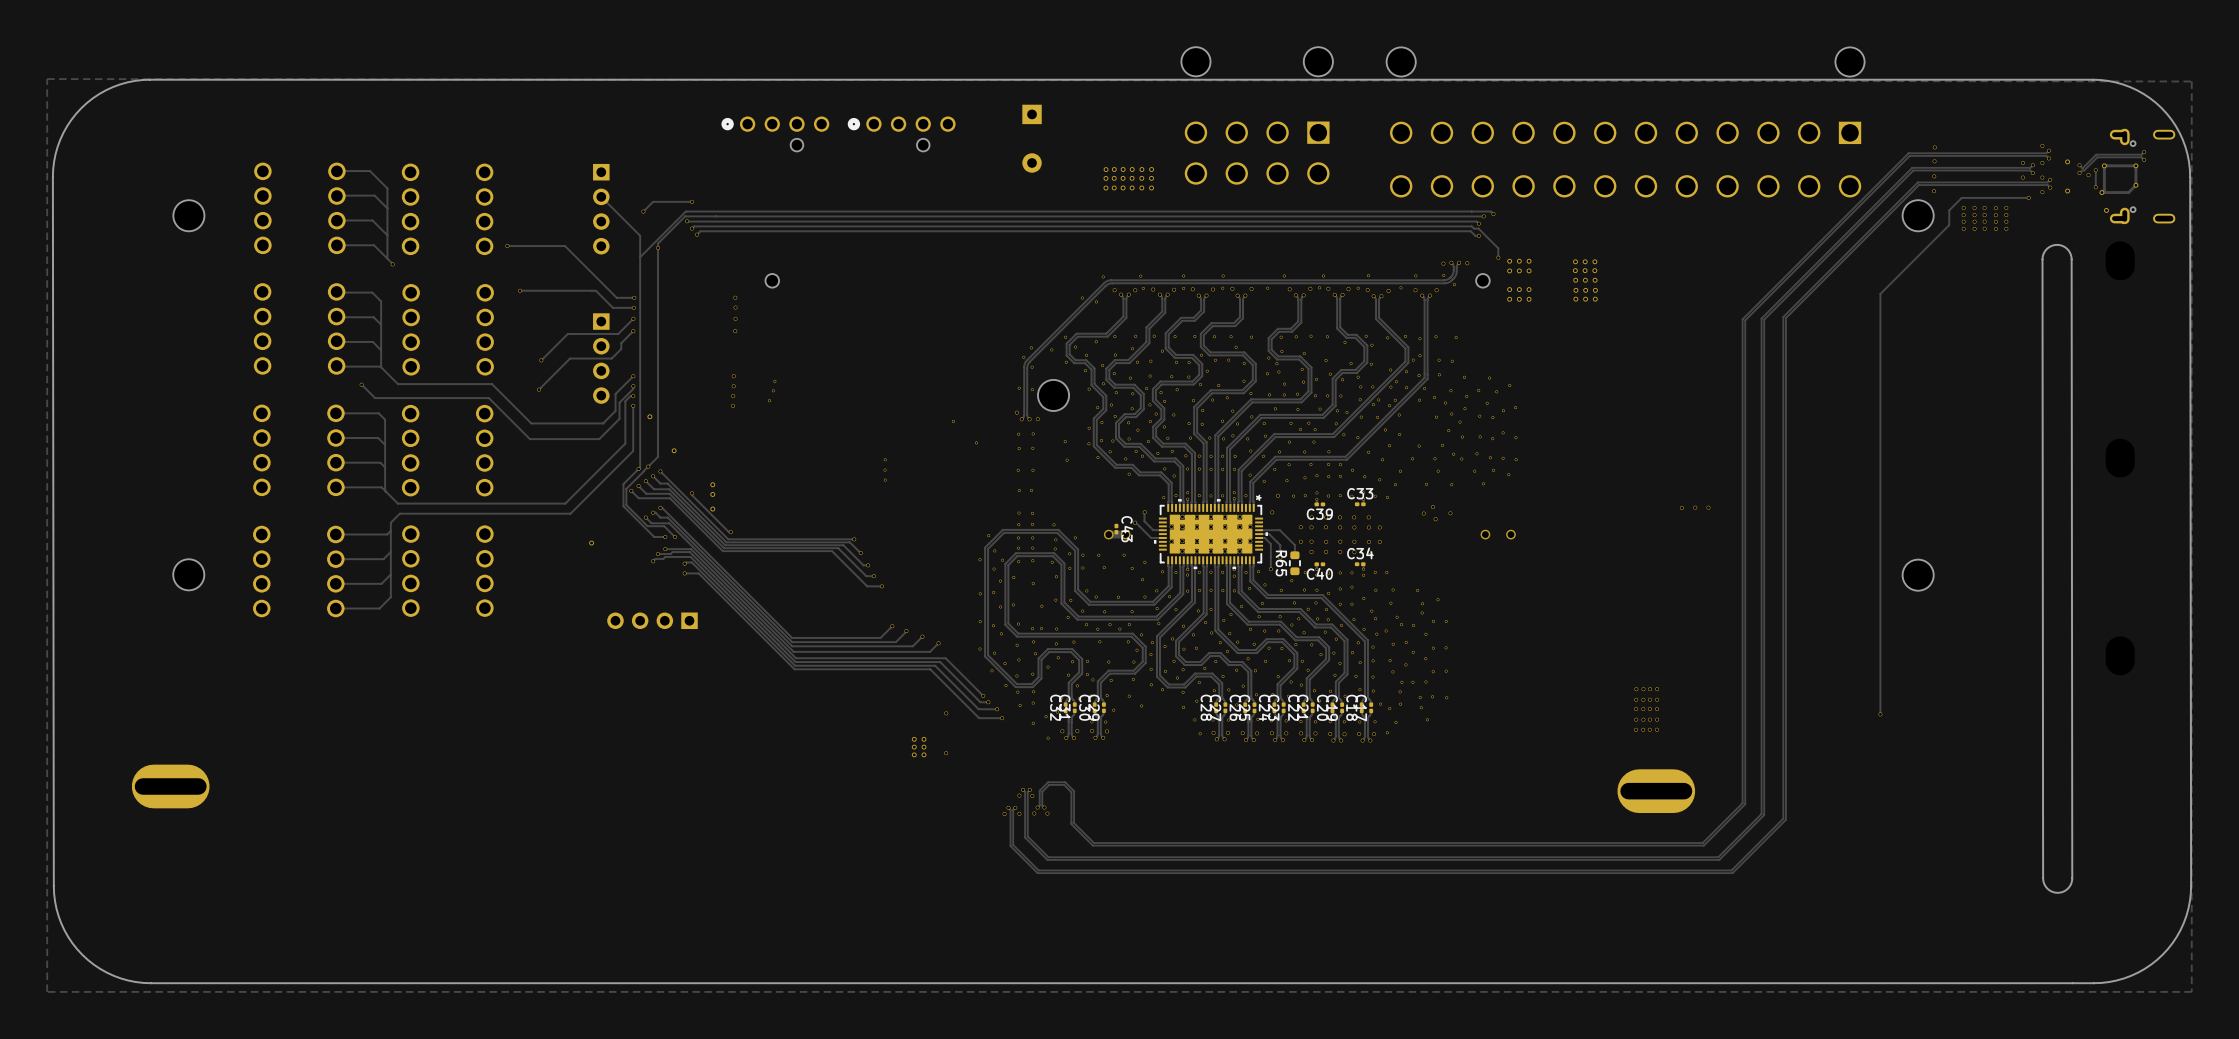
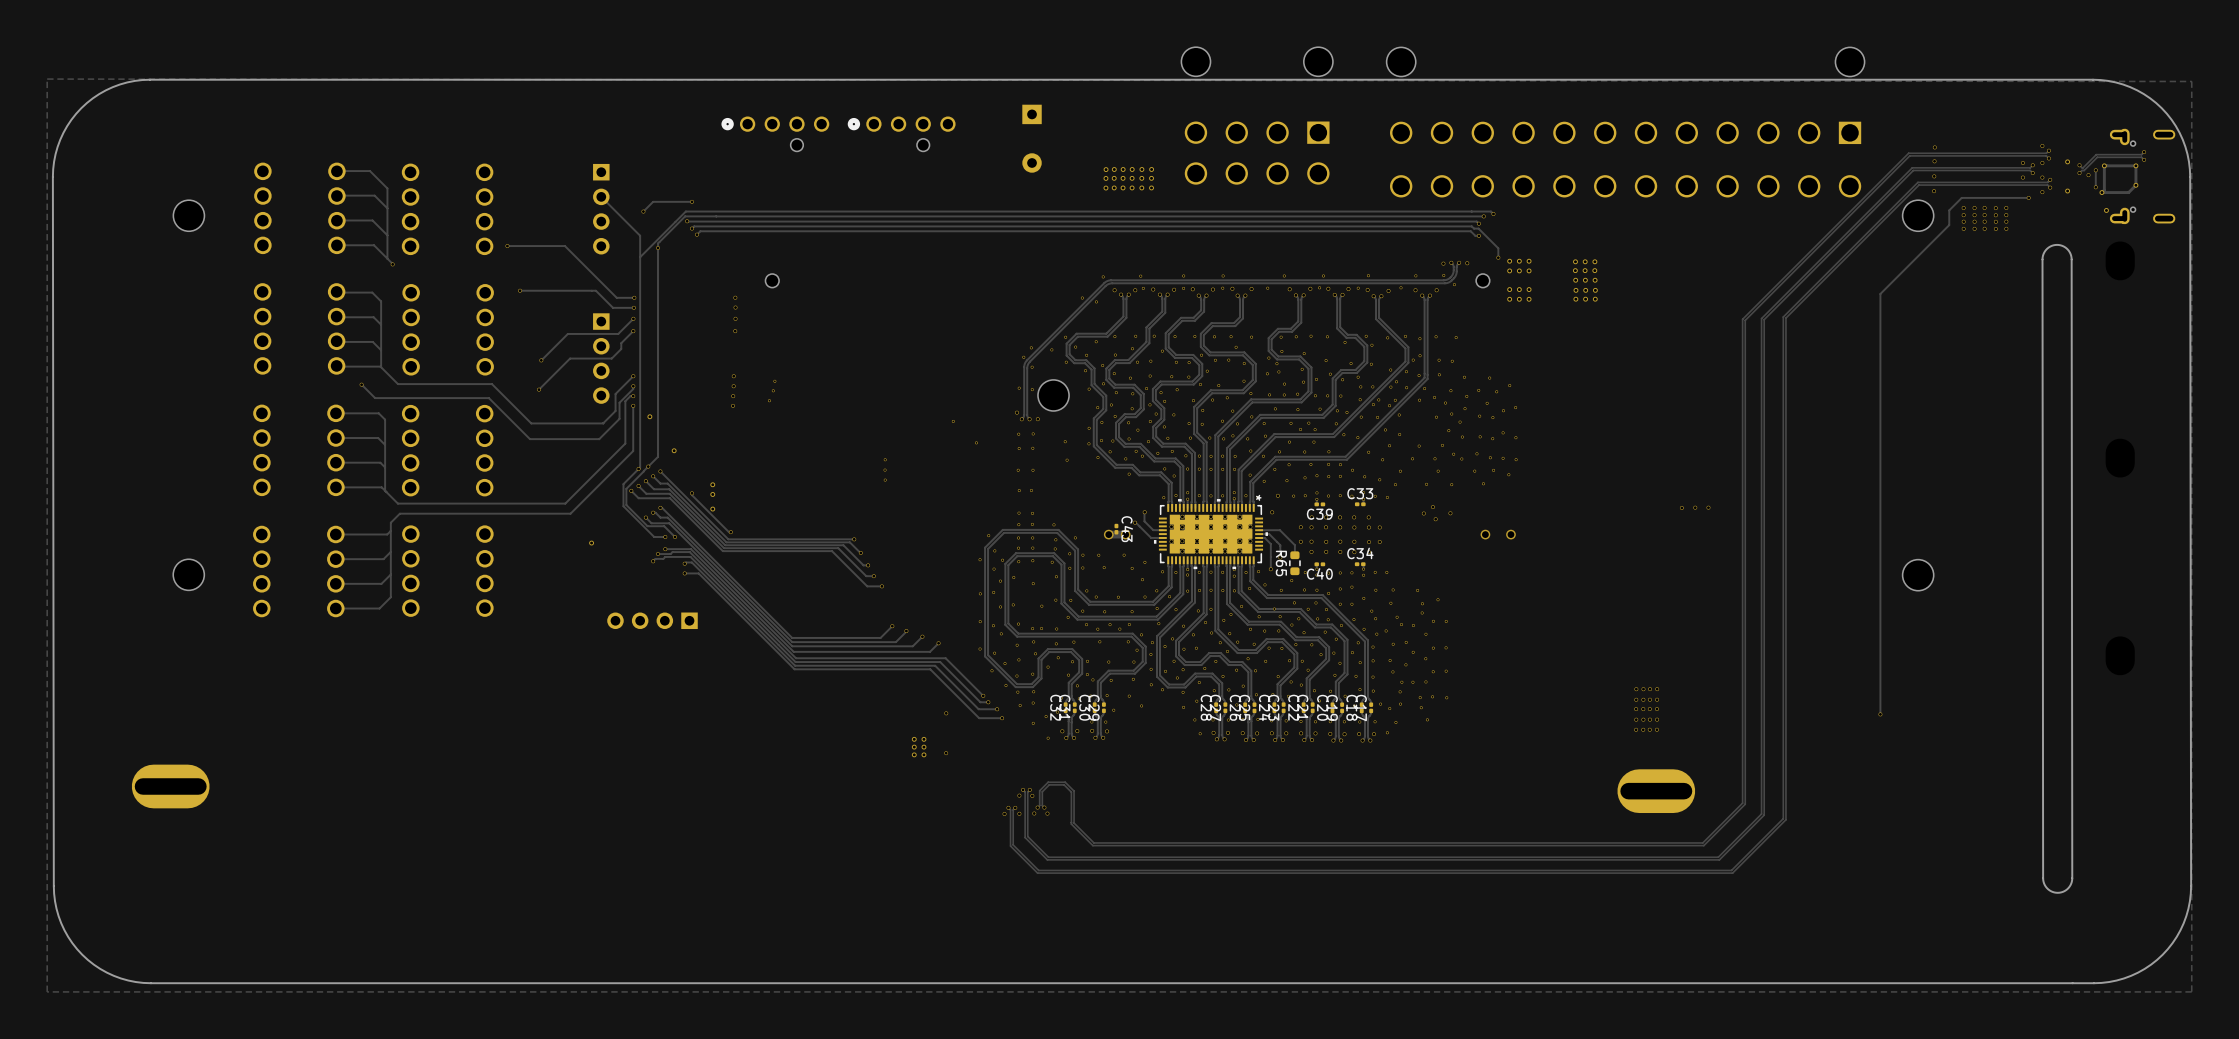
via position: (1262, 603) -> (1274, 609)

